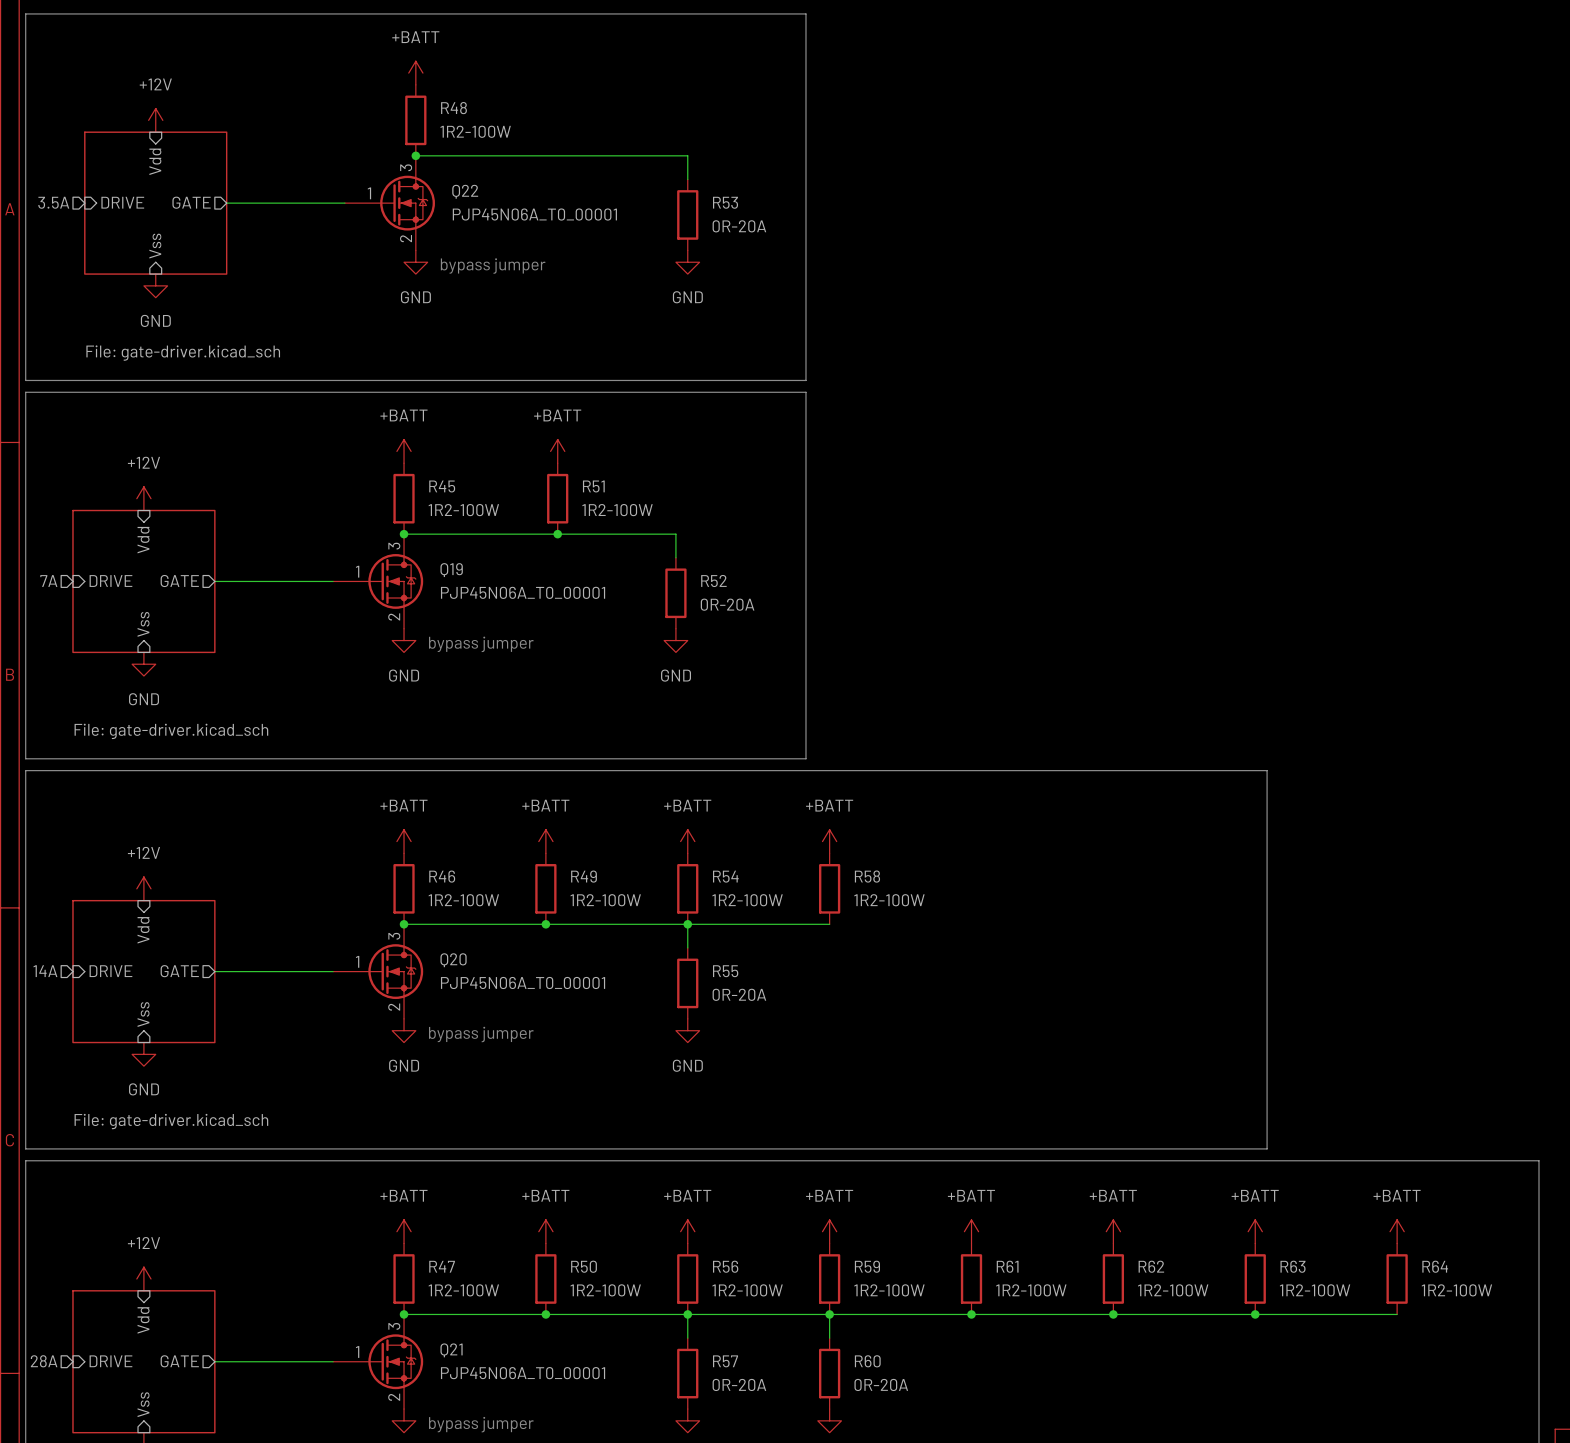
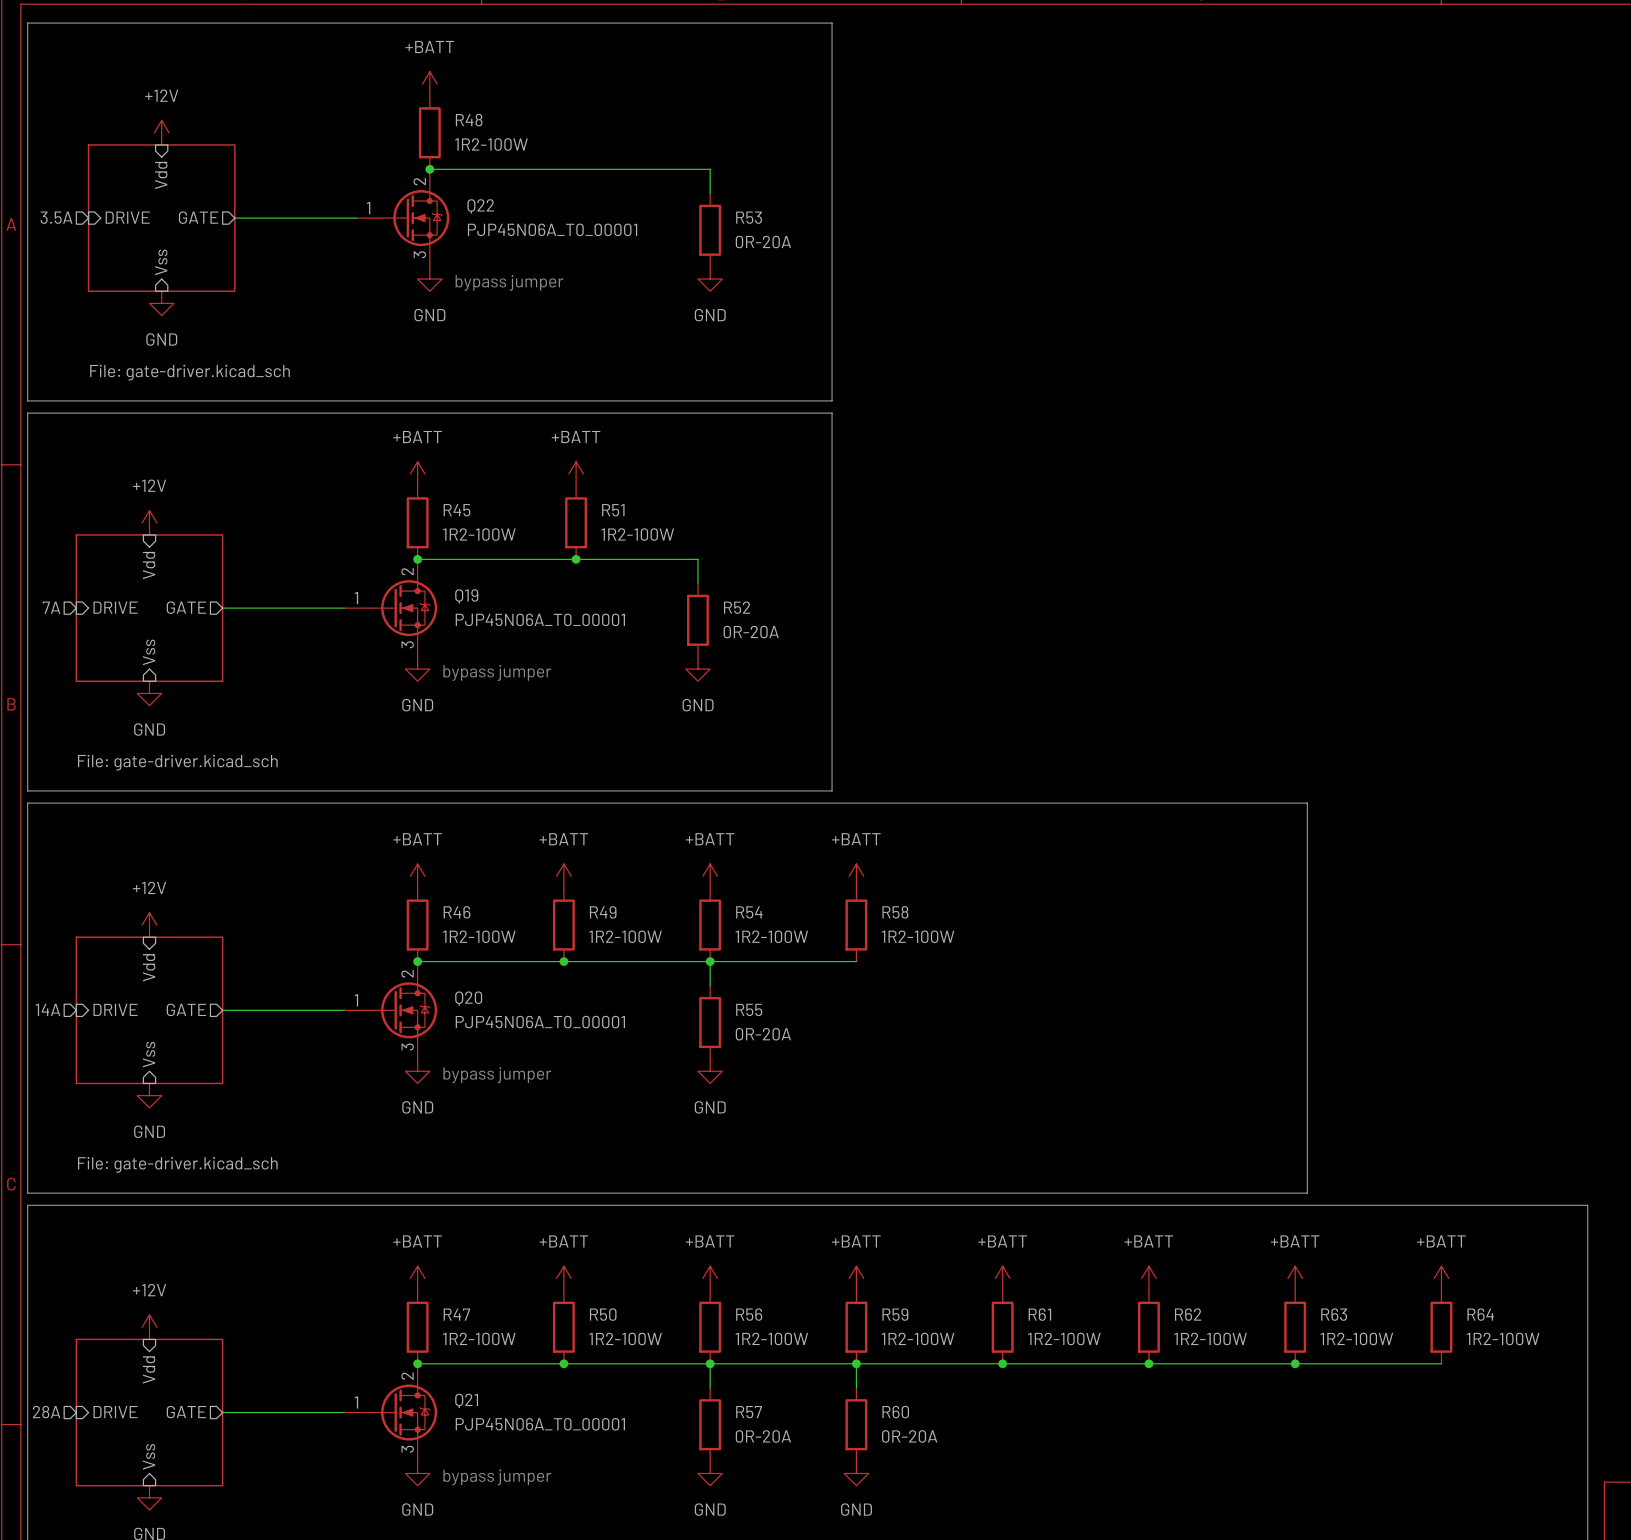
Q22 symbol: [344, 155, 435, 251] -> [356, 169, 450, 267]
Q19 symbol: [333, 534, 424, 629] -> [344, 559, 438, 657]
Q20 symbol: [333, 924, 424, 1019] -> [344, 961, 438, 1060]
Q21 symbol: [333, 1314, 424, 1410] -> [344, 1363, 438, 1462]

